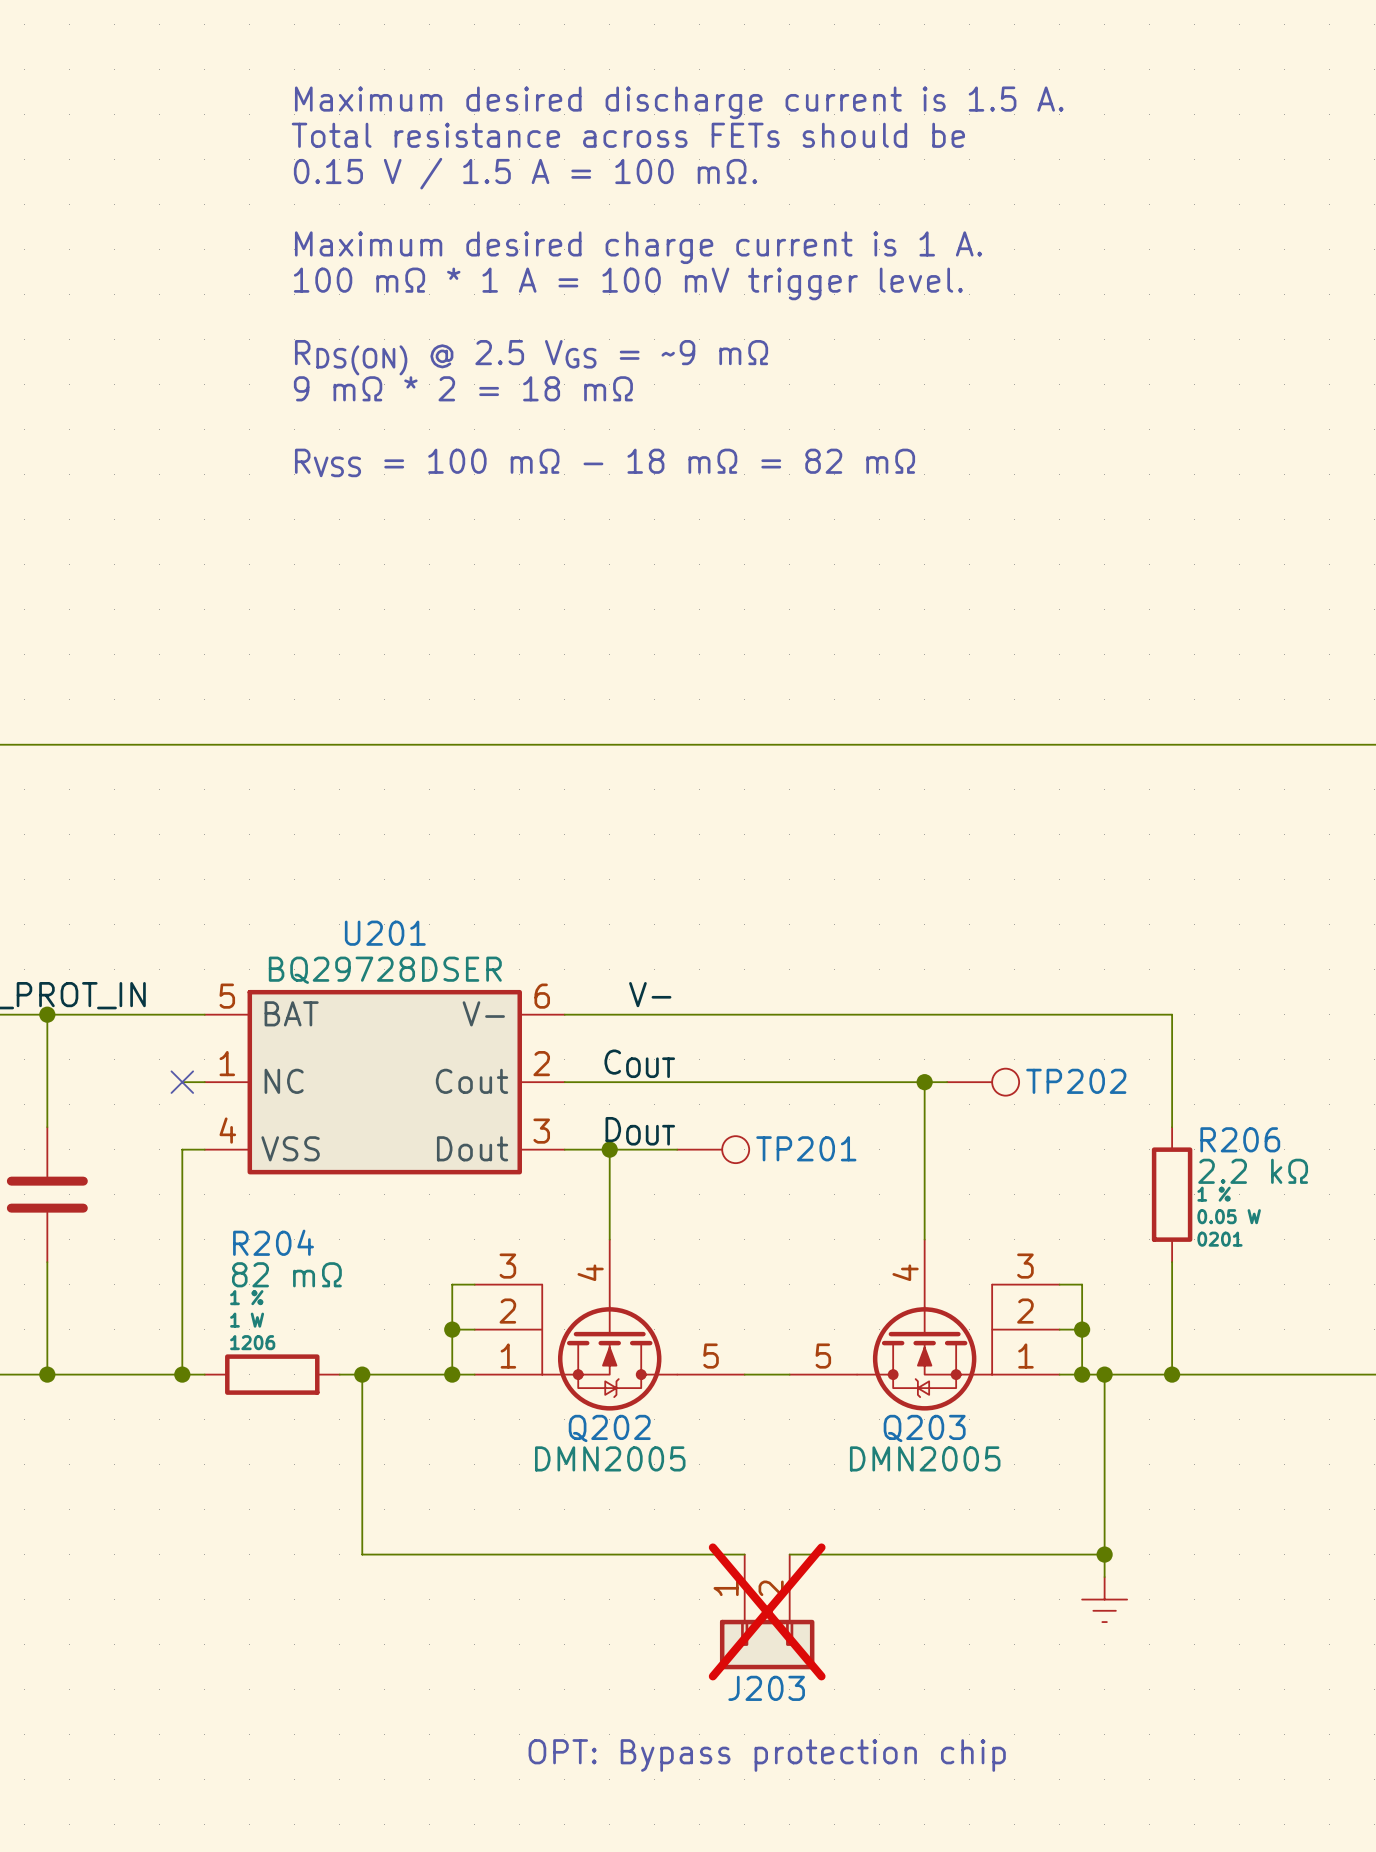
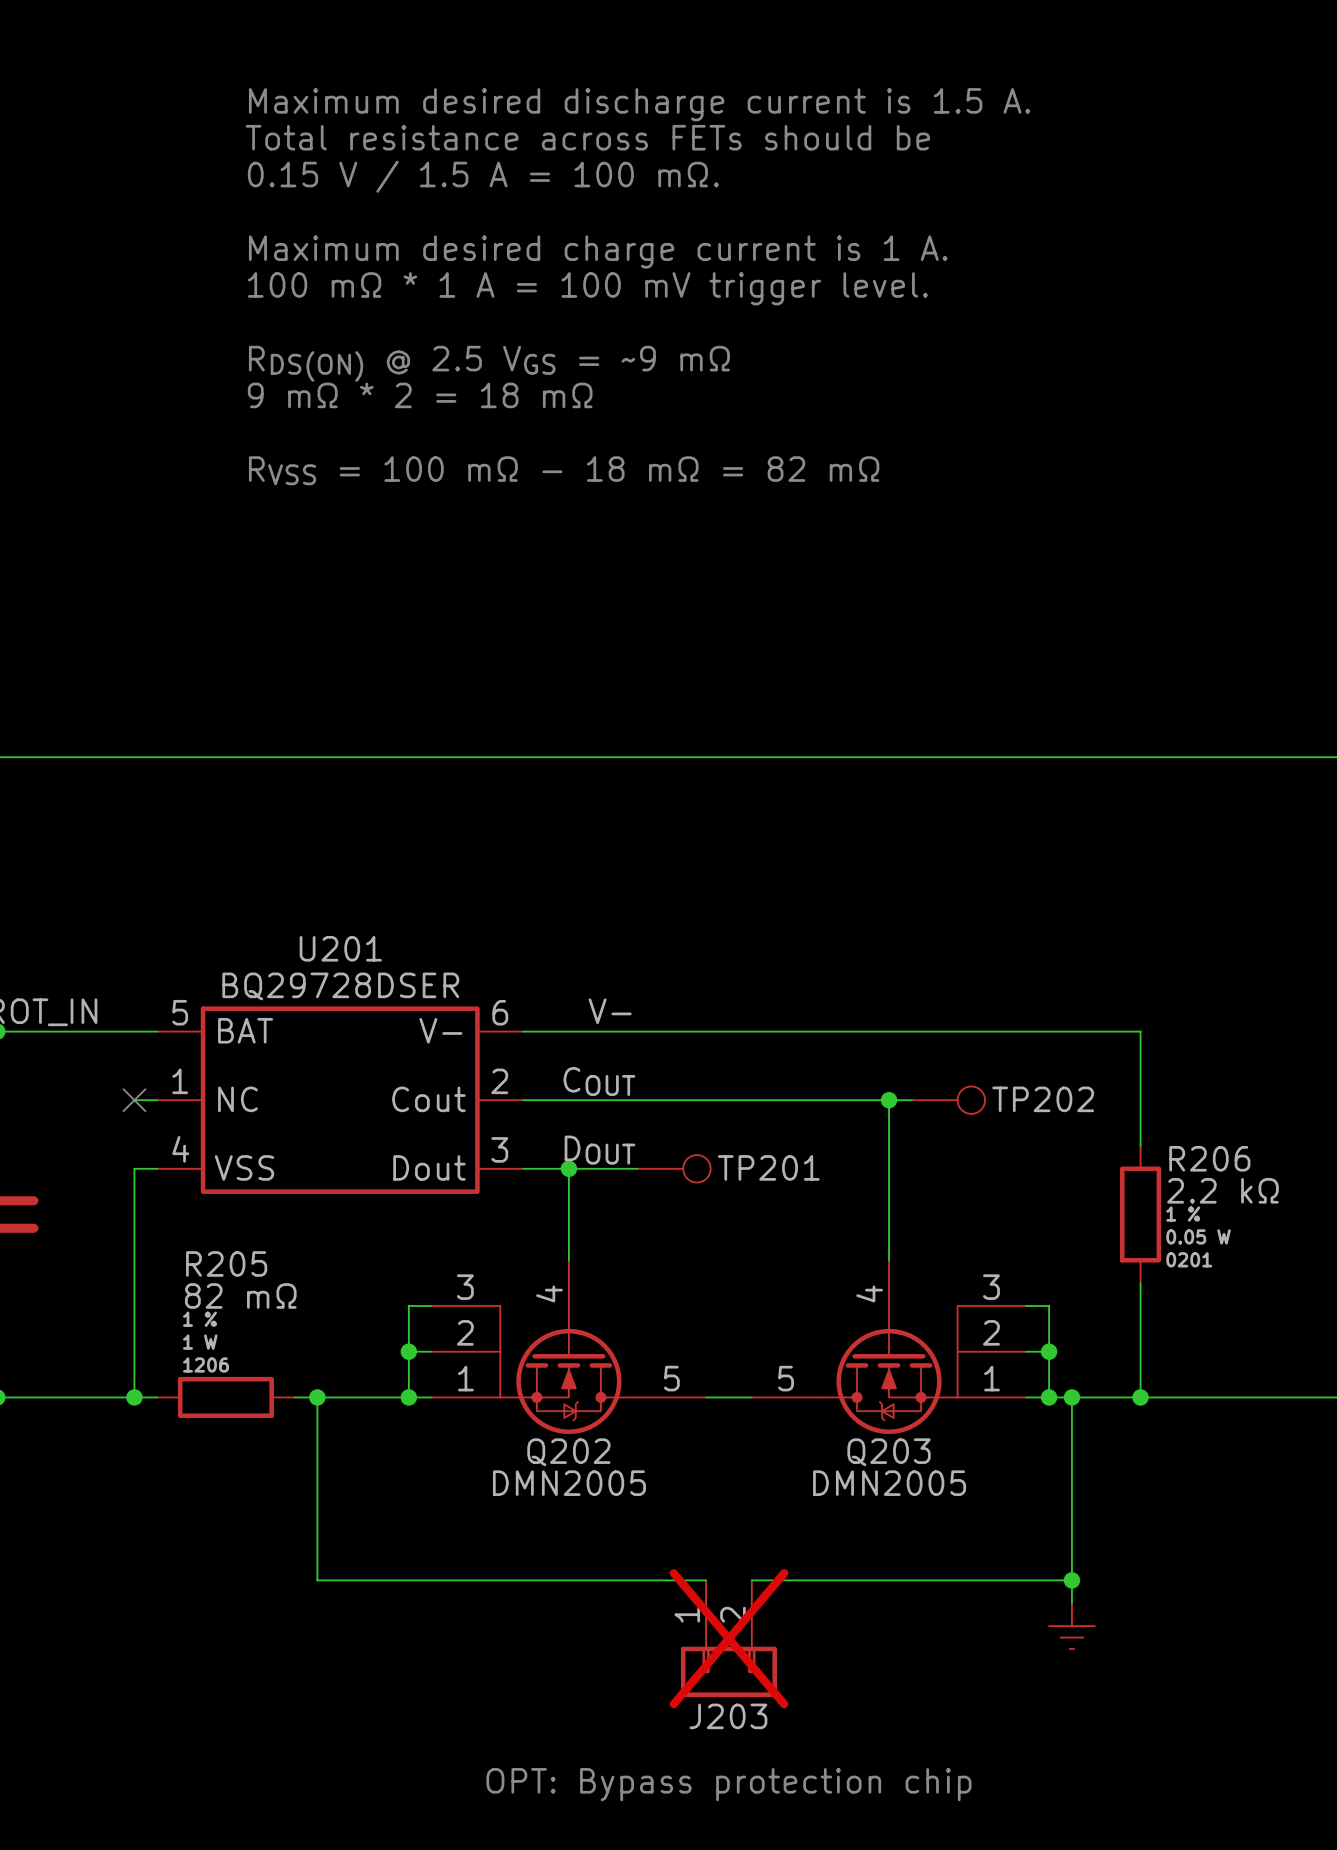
R204 name: R204 (273, 1242) -> R205 (226, 1263)

